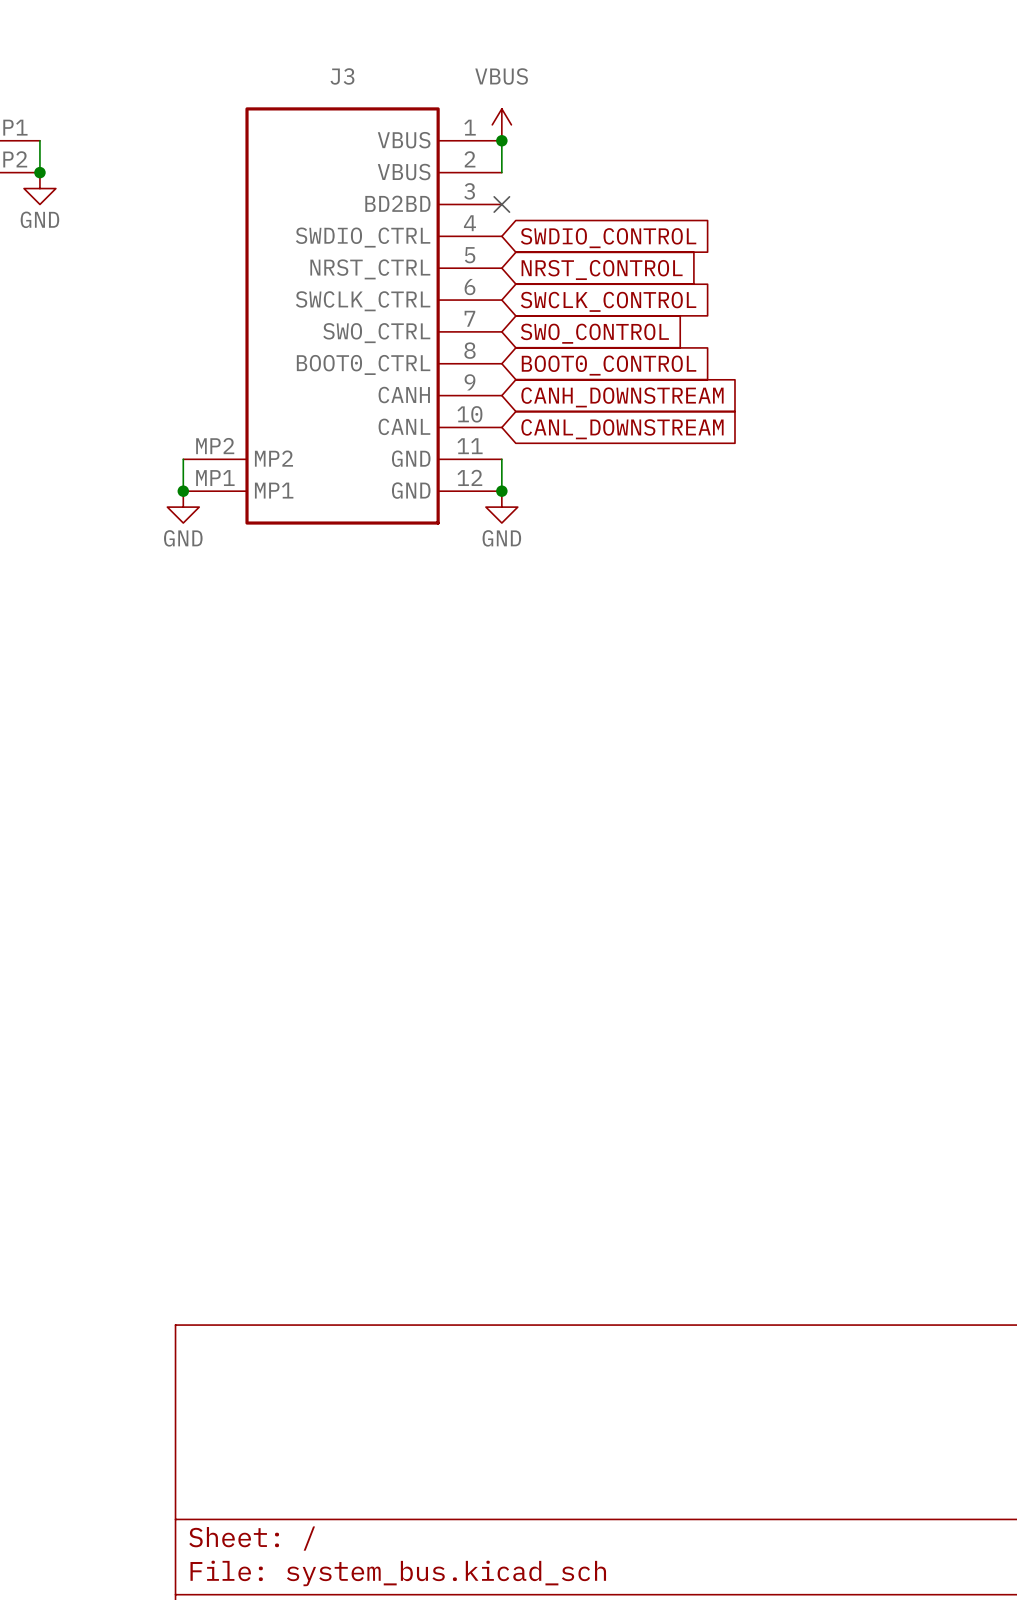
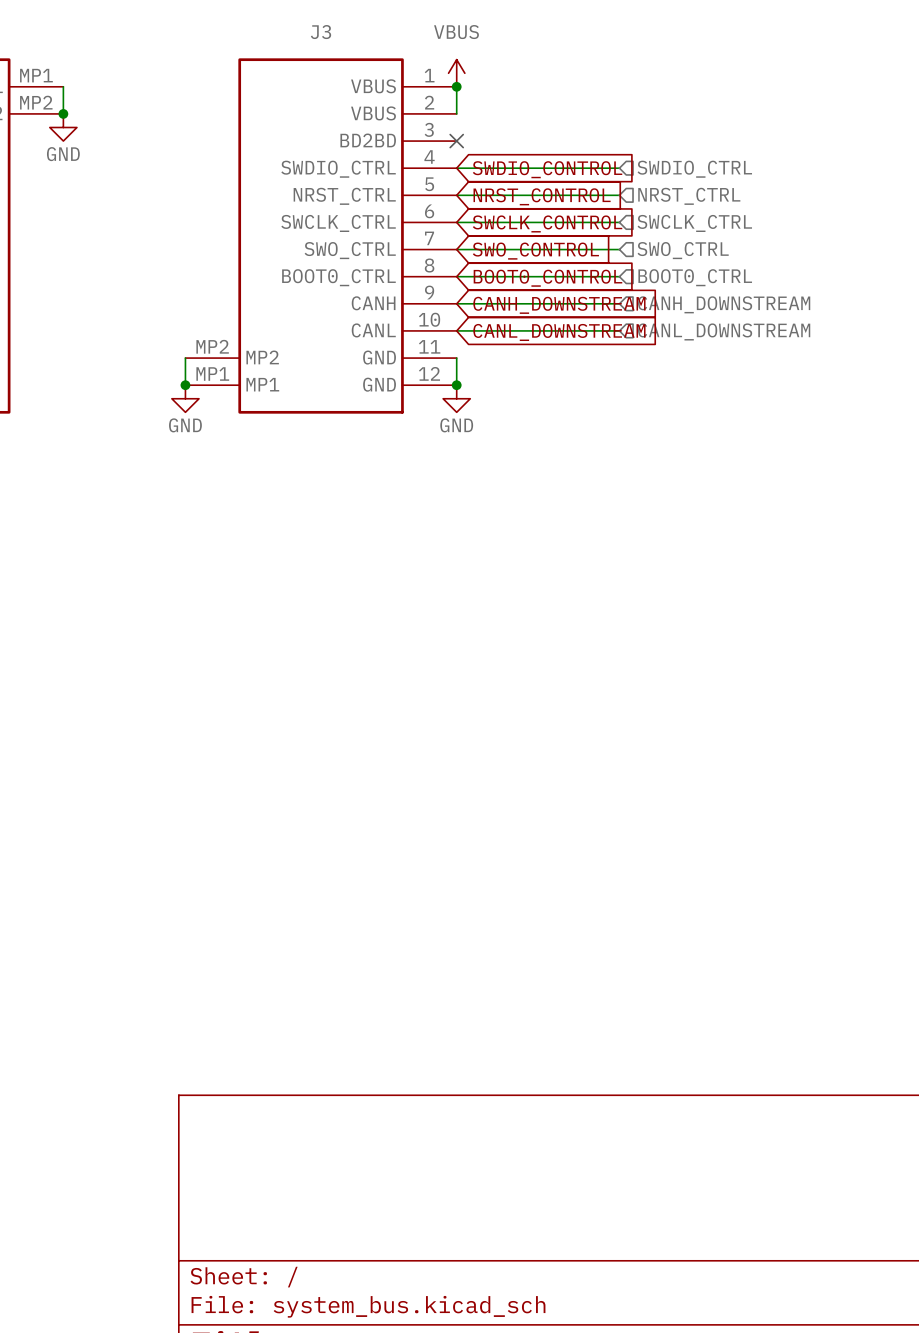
wire: none -> (456, 168) (619, 168)
hierarchical label: none -> SWDIO_CTRL (694, 169)
wire: none -> (456, 195) (619, 195)
hierarchical label: none -> NRST_CTRL (689, 196)
wire: none -> (456, 222) (619, 222)
hierarchical label: none -> SWCLK_CTRL (694, 223)
wire: none -> (456, 249) (619, 249)
hierarchical label: none -> SWO_CTRL (683, 250)
wire: none -> (456, 276) (619, 276)
hierarchical label: none -> BOOT0_CTRL (695, 277)
wire: none -> (456, 303) (619, 303)
hierarchical label: none -> CANH_DOWNSTREAM (724, 304)
wire: none -> (456, 330) (619, 330)
hierarchical label: none -> CANL_DOWNSTREAM (724, 331)

